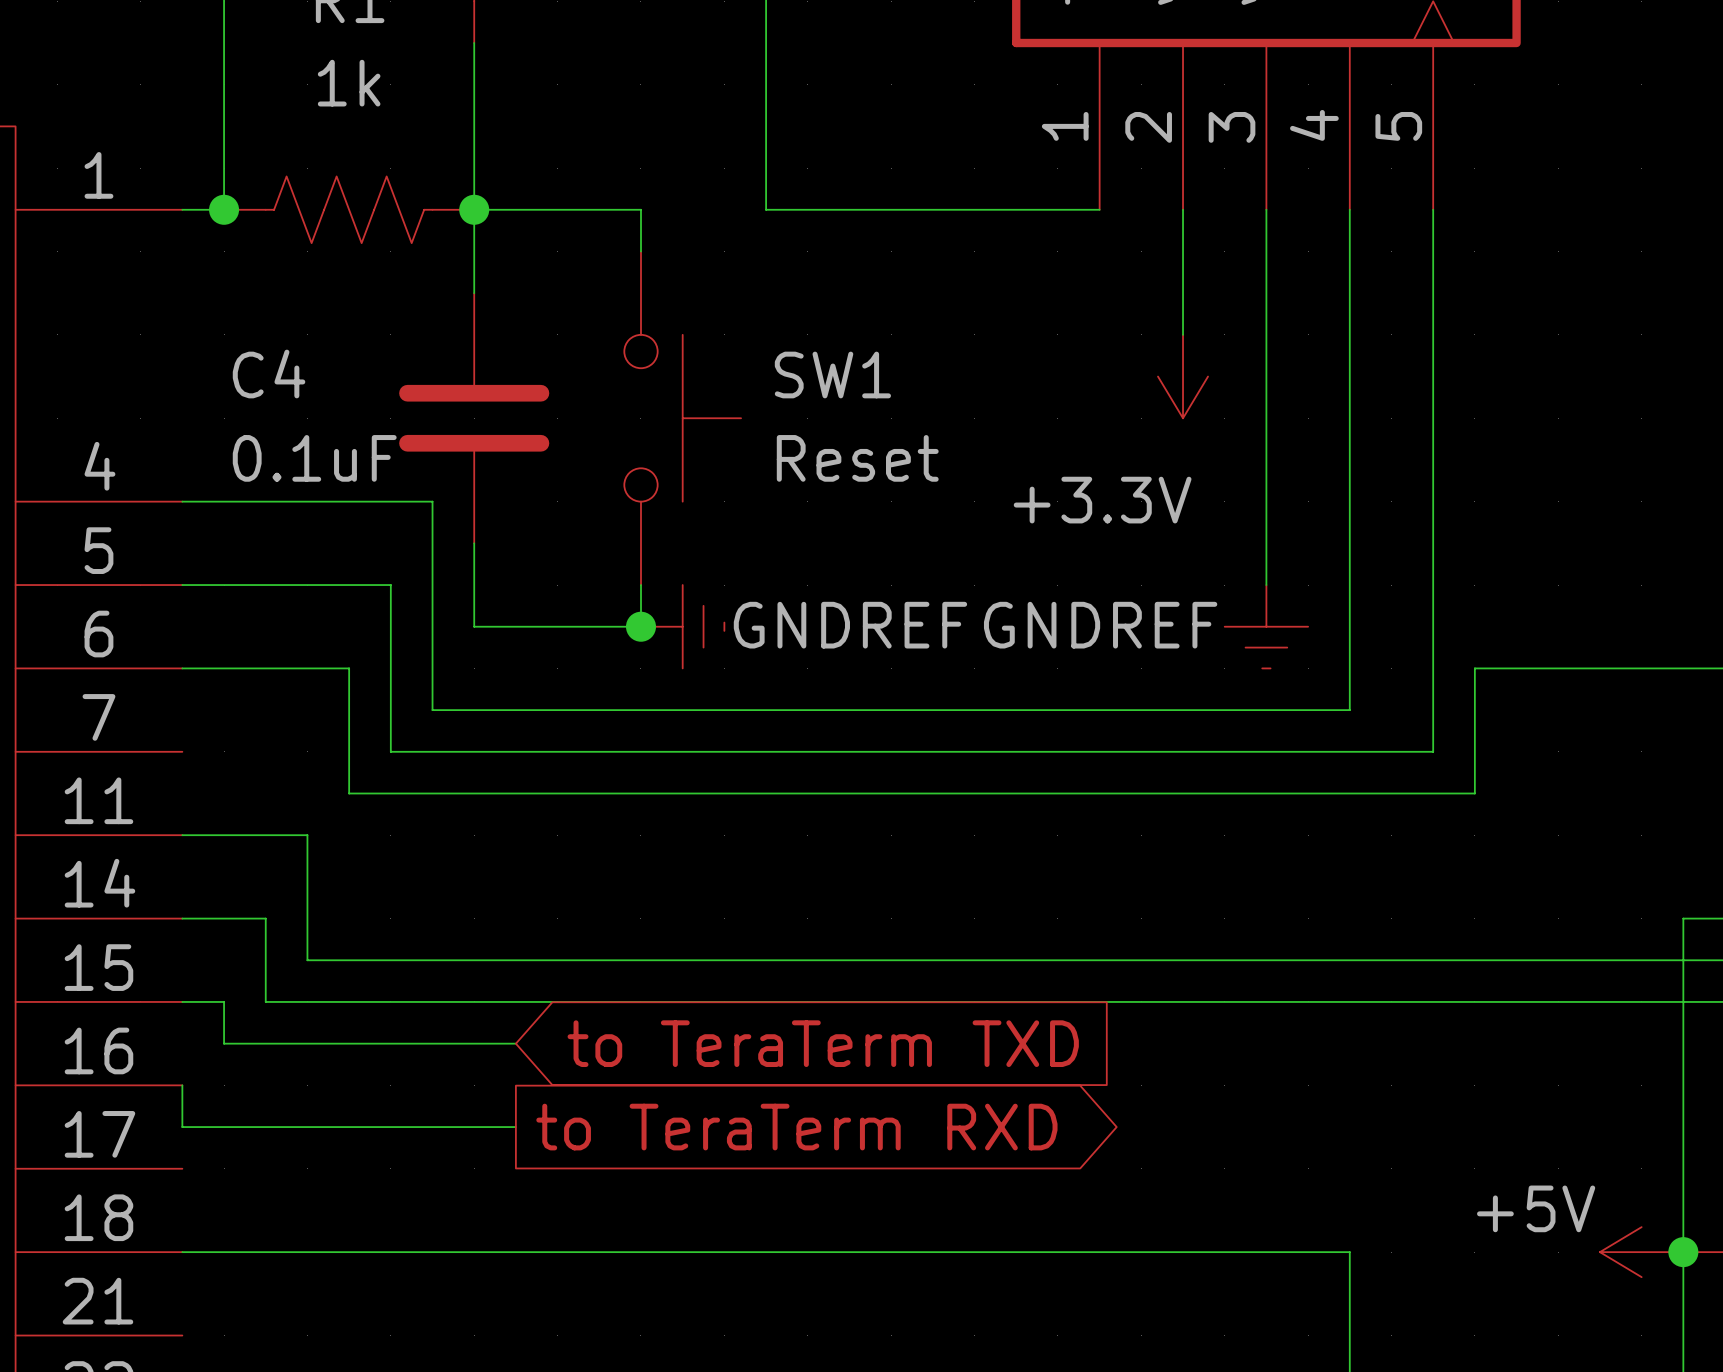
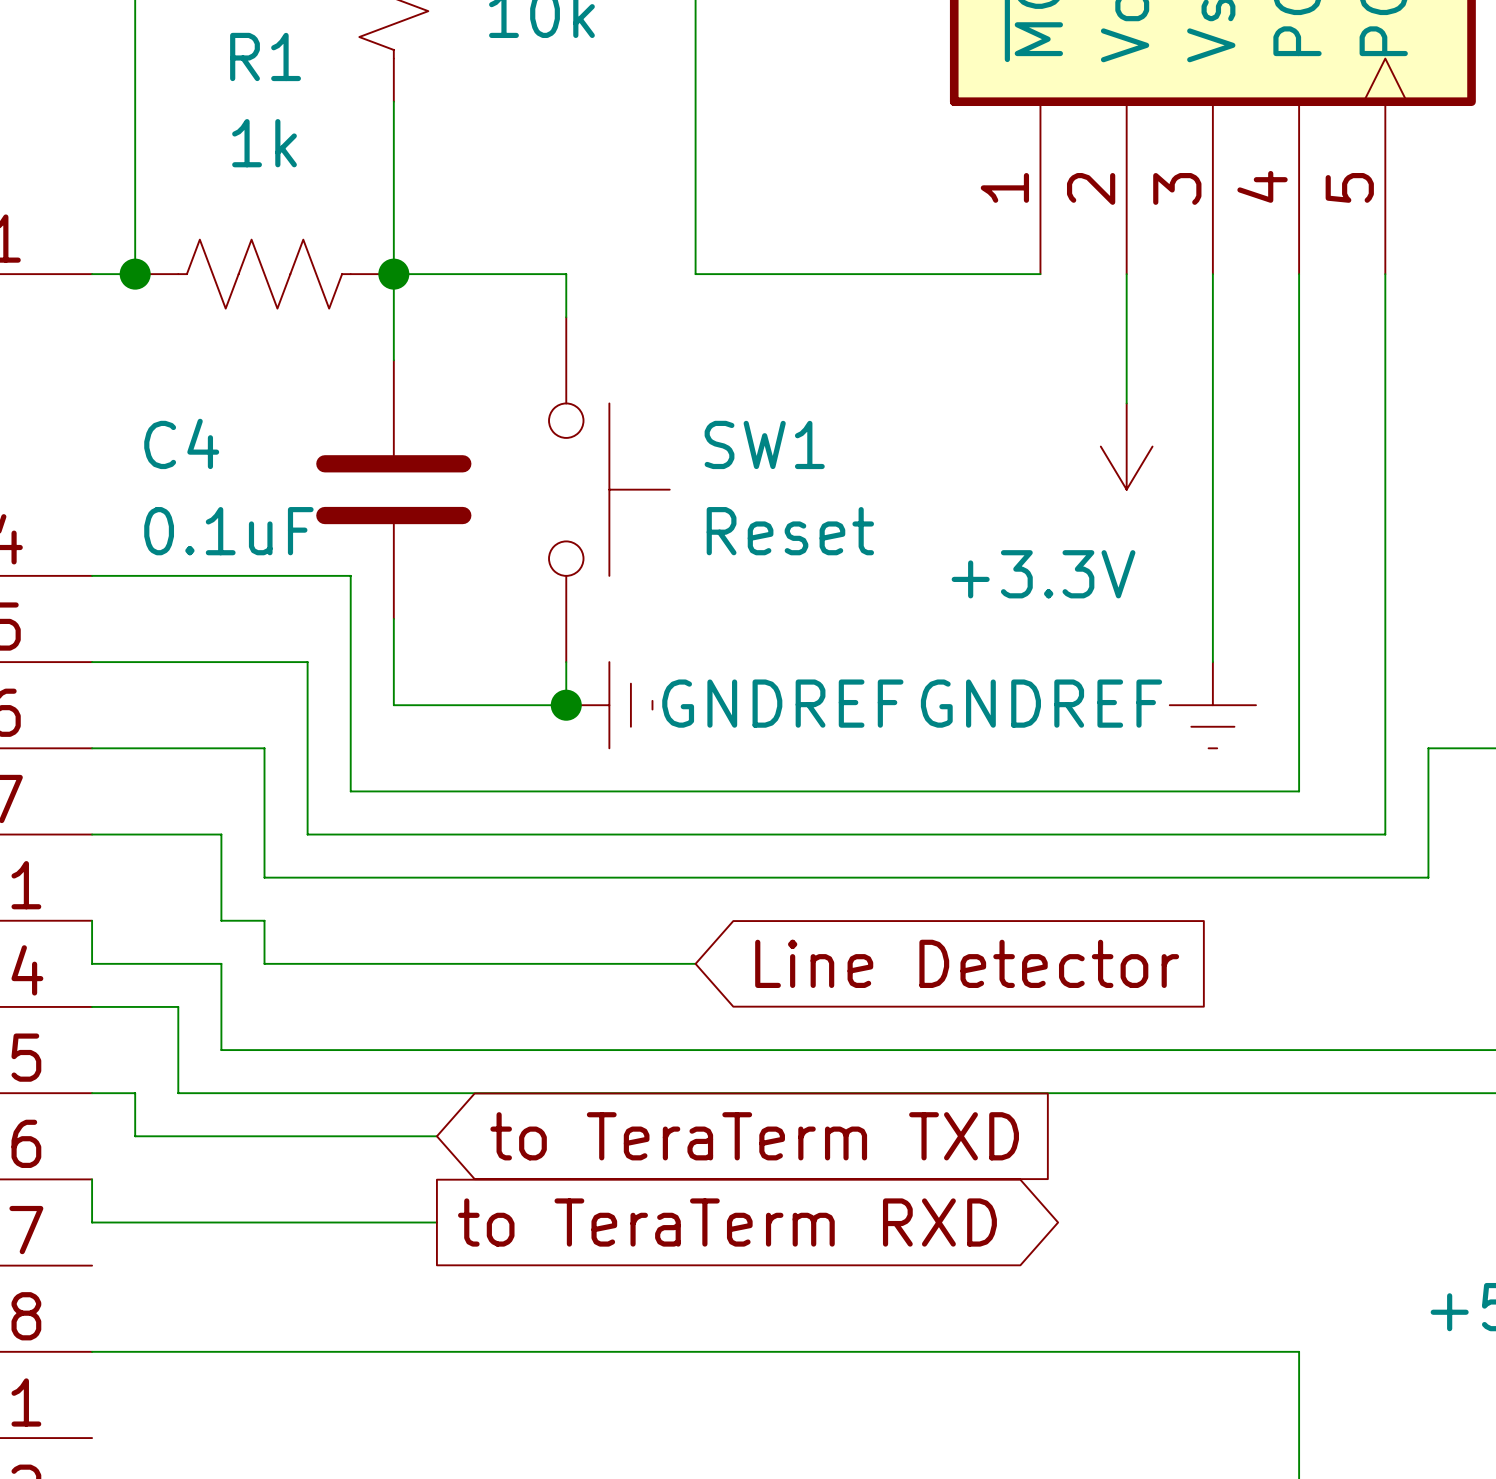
wire: none -> (92, 834) (221, 834) (221, 920) (264, 920) (264, 963) (695, 963)
wire: (182, 835) (307, 835) (307, 876) -> (92, 920) (92, 963) (221, 963)
global label: none -> Line Detector (967, 963)

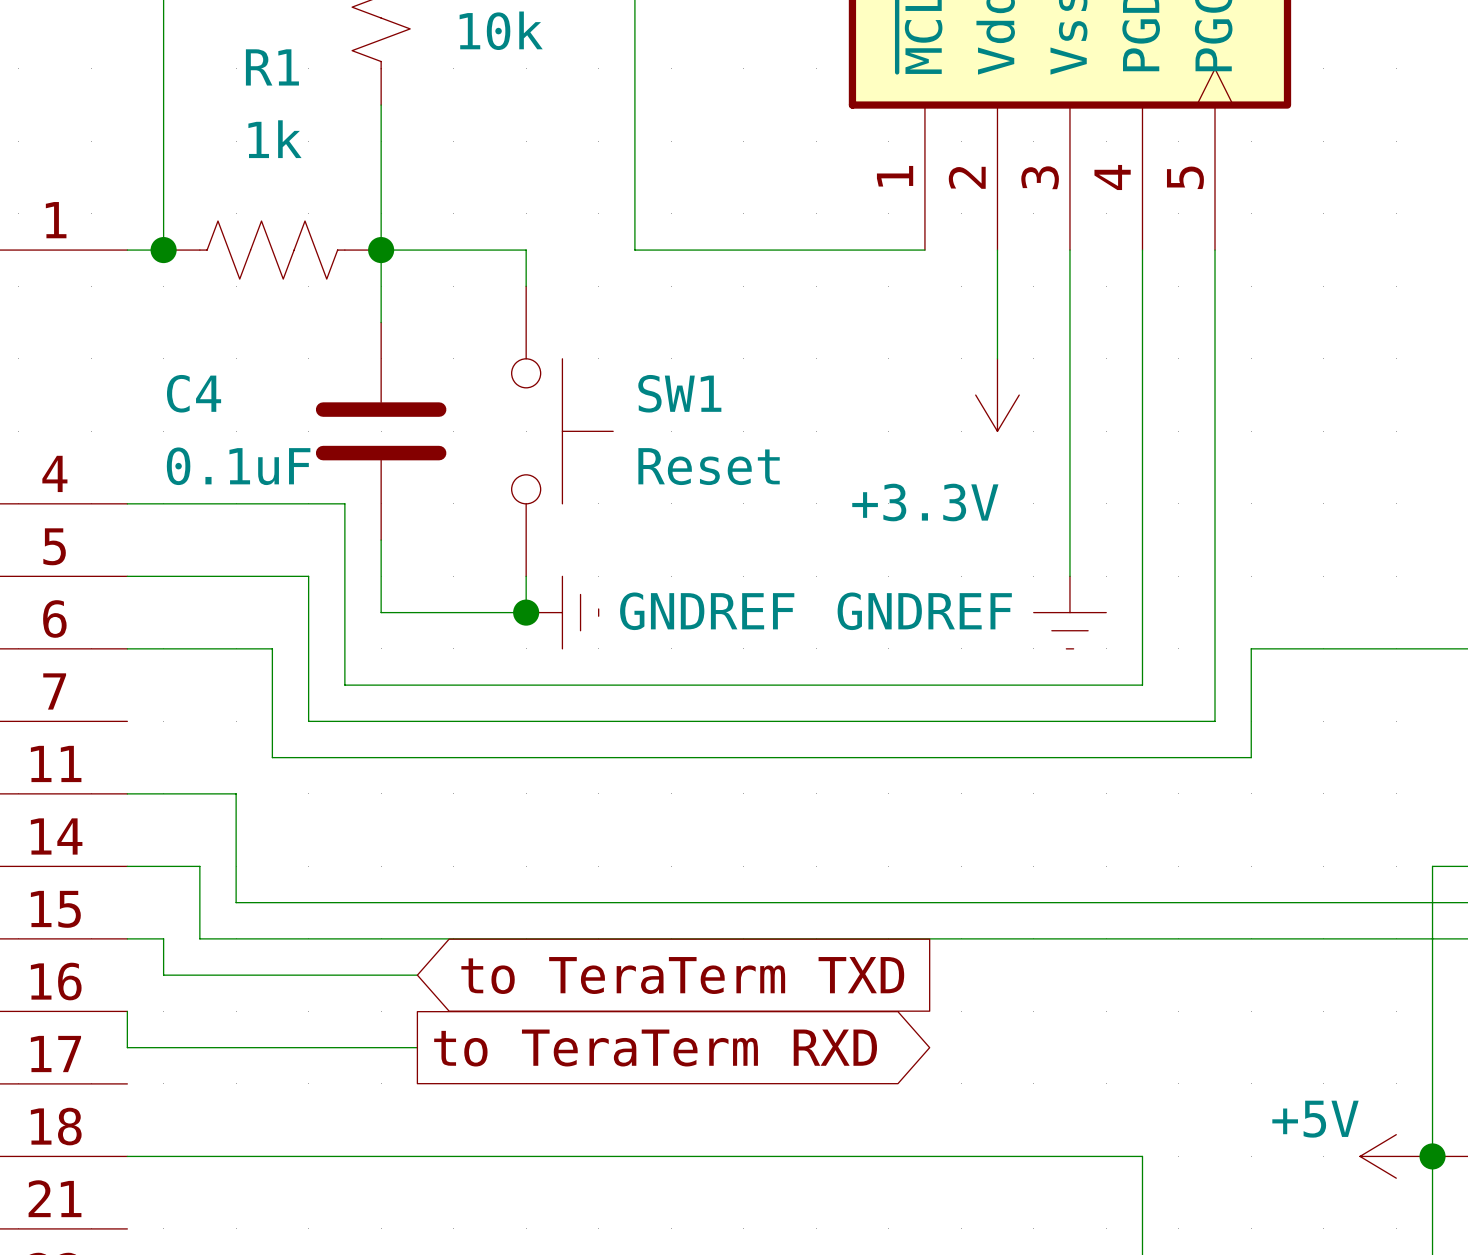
wire: (92, 834) (221, 834) (221, 920) (264, 920) (264, 963) (695, 963) -> none
wire: (92, 920) (92, 963) (221, 963) -> (127, 793) (236, 793) (236, 830)
global label: Line Detector (967, 963) -> none

